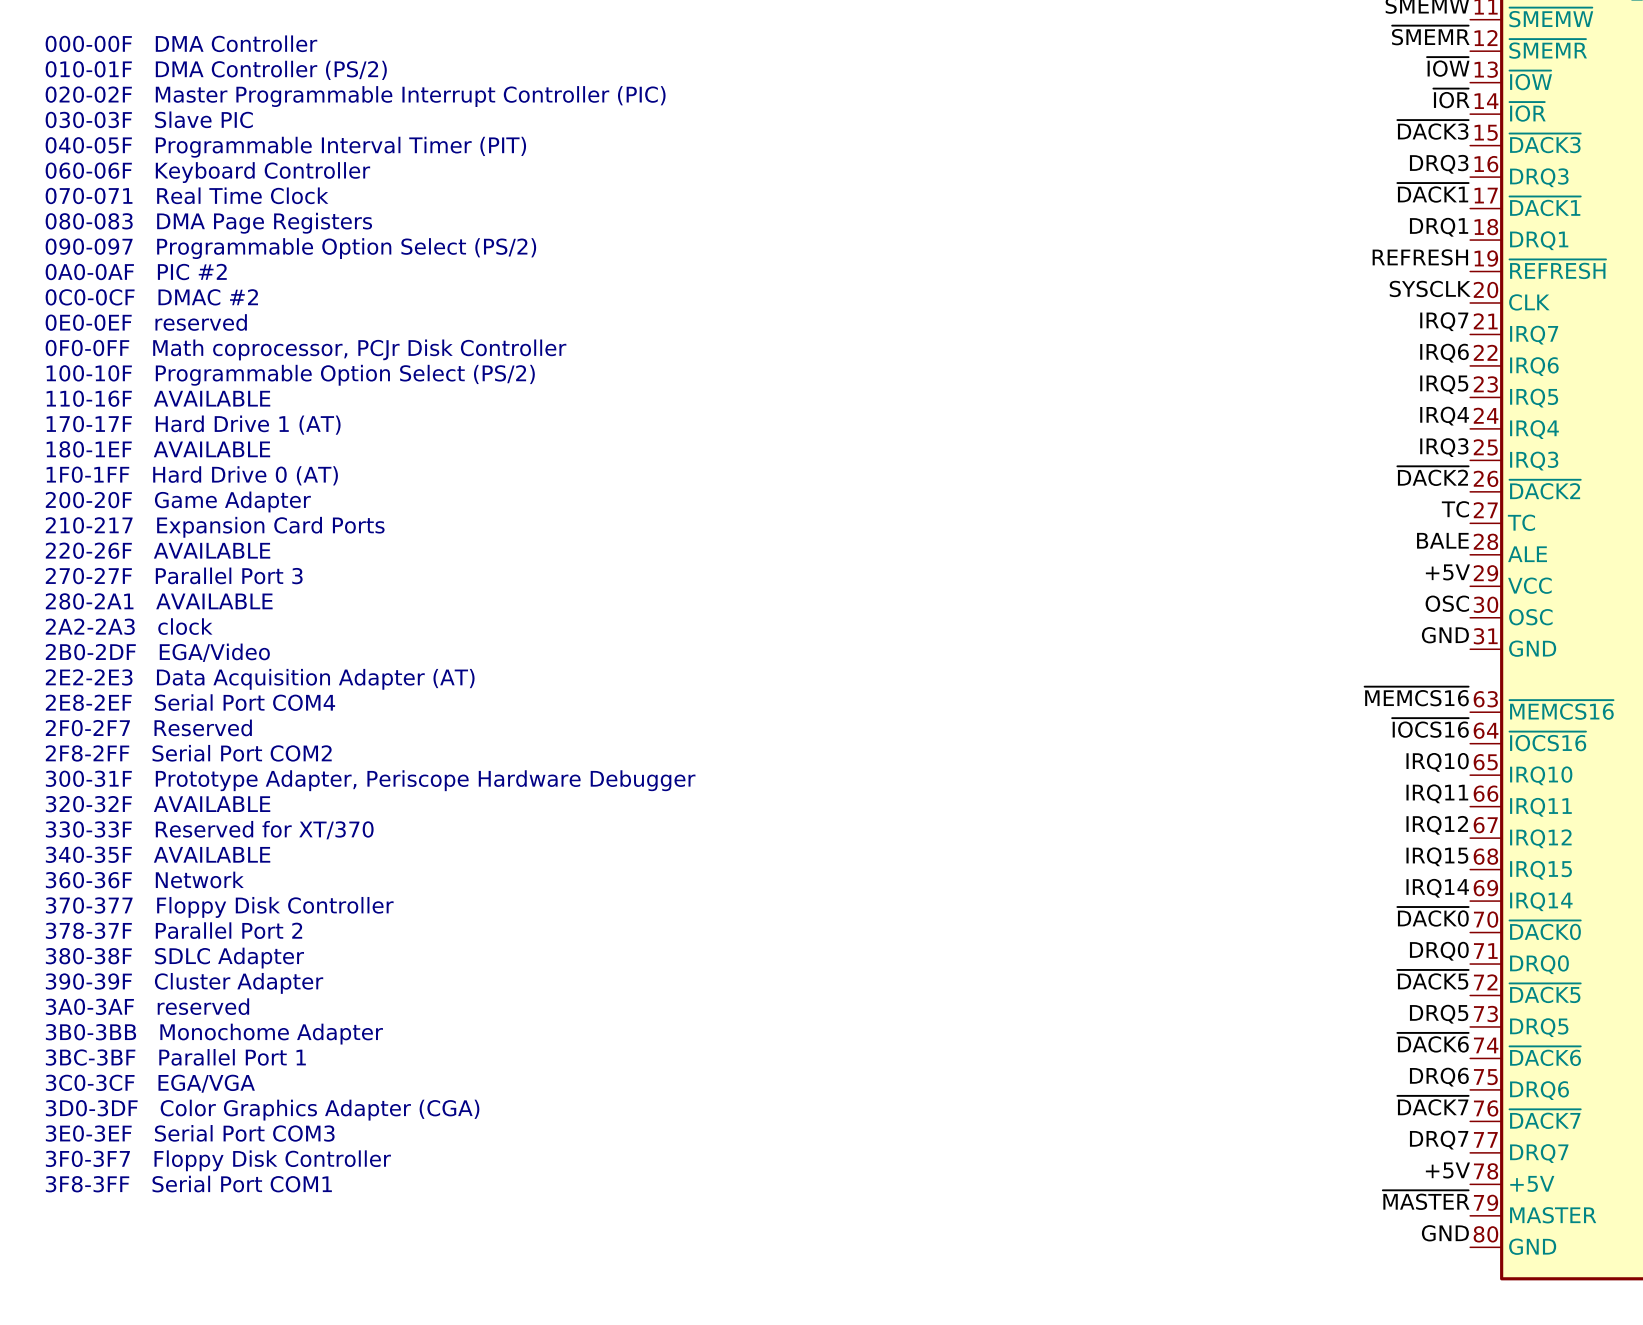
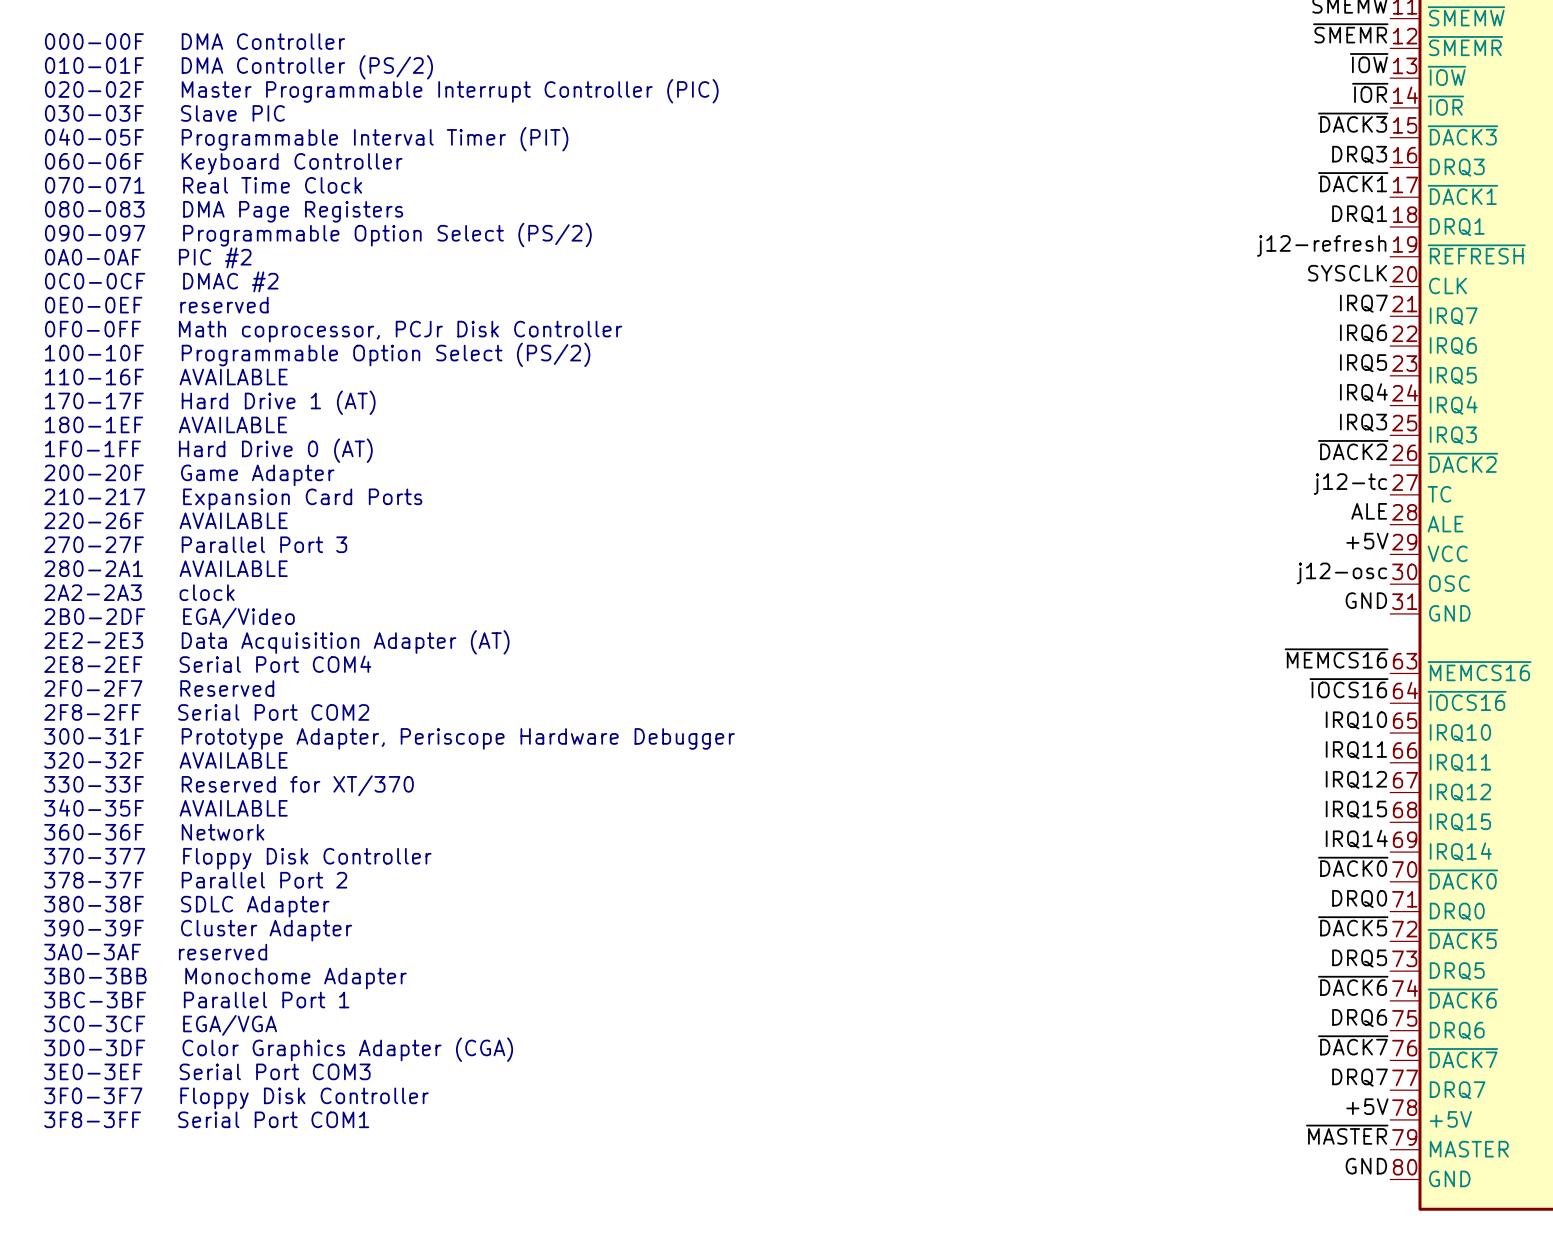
label: REFRESH (1420, 257) -> j12-refresh (1321, 245)
label: TC (1455, 509) -> j12-tc (1350, 484)
label: BALE (1442, 540) -> ALE (1369, 511)
label: OSC (1447, 603) -> j12-osc (1341, 573)

